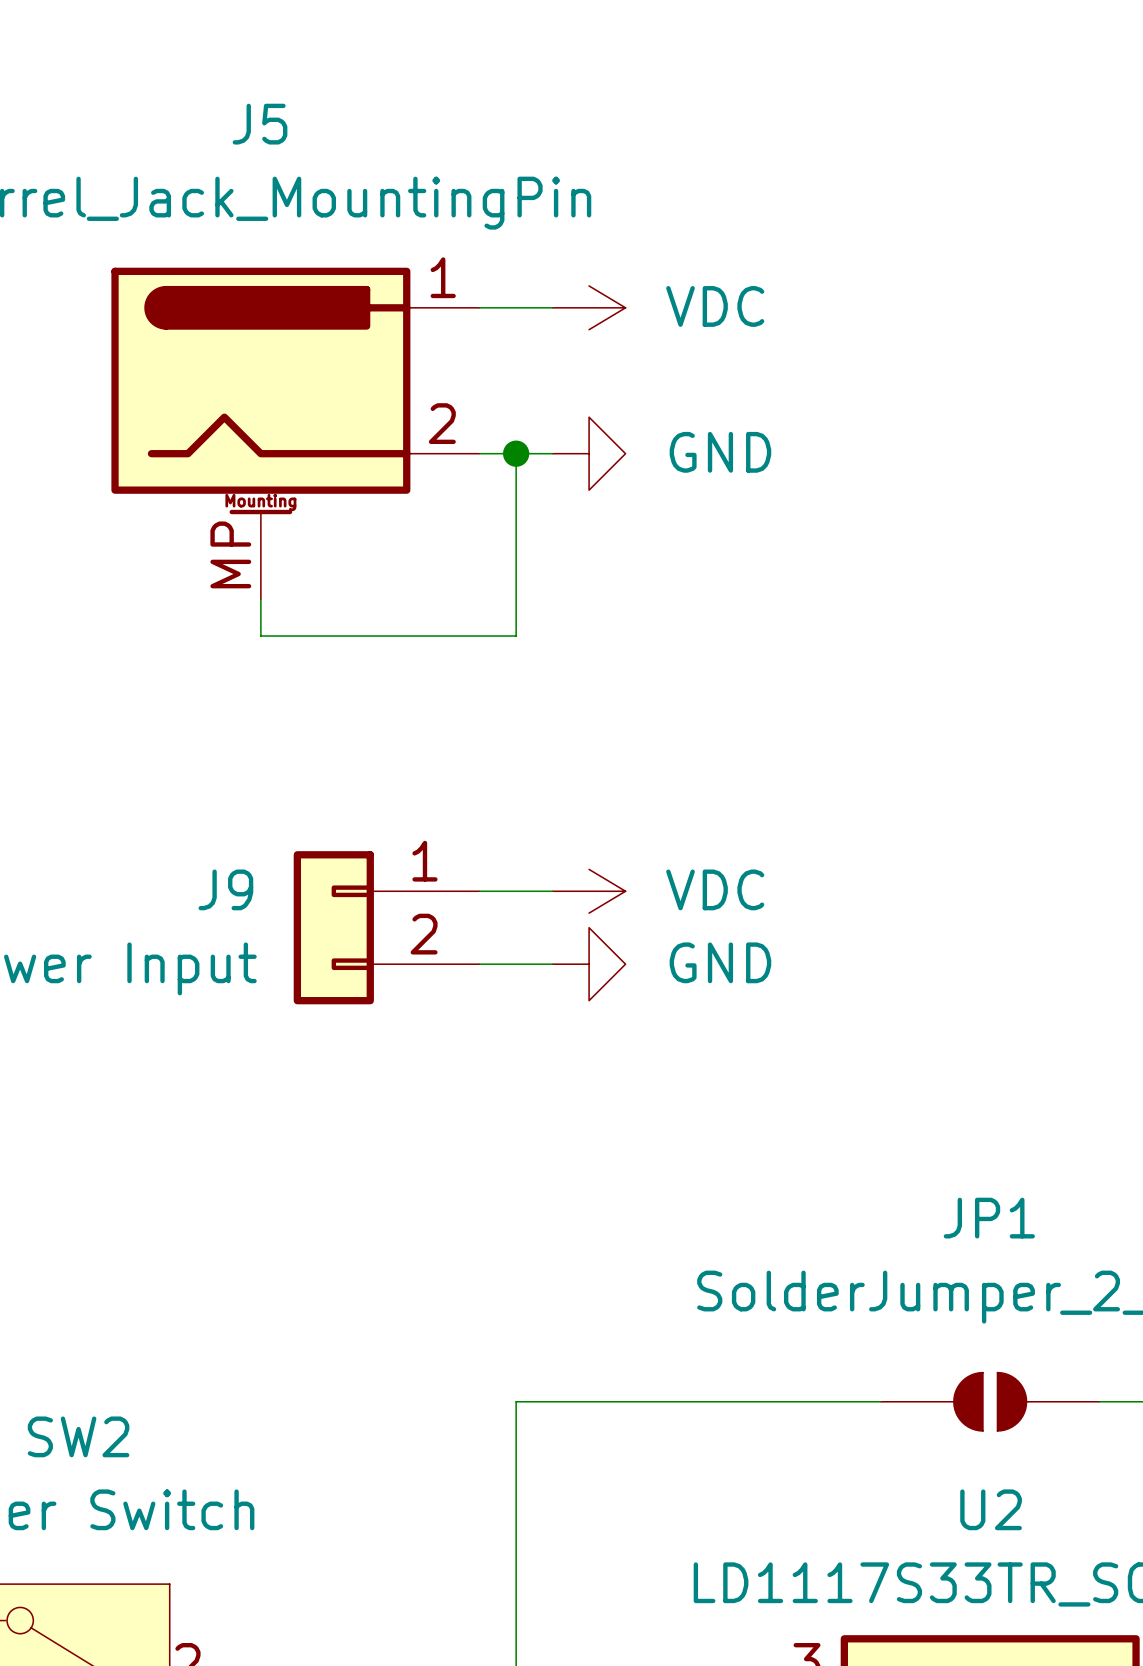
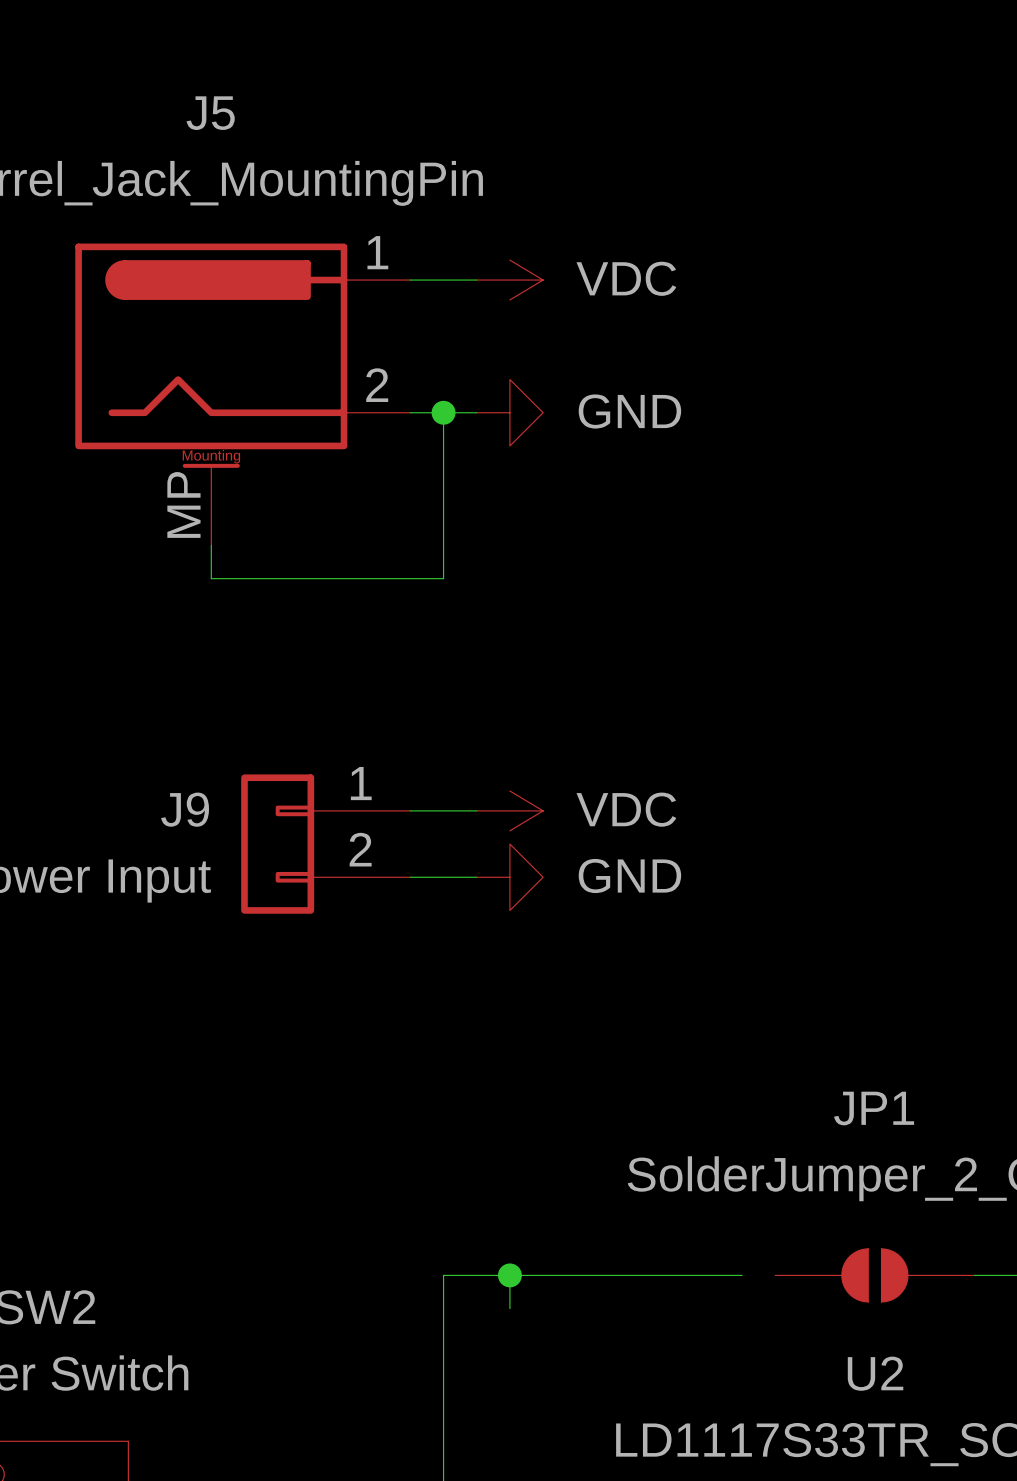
wire: none -> (509, 1275) (509, 1308)
junction: none -> (509, 1275)
wire: (844, 1401) (880, 1401) -> none

